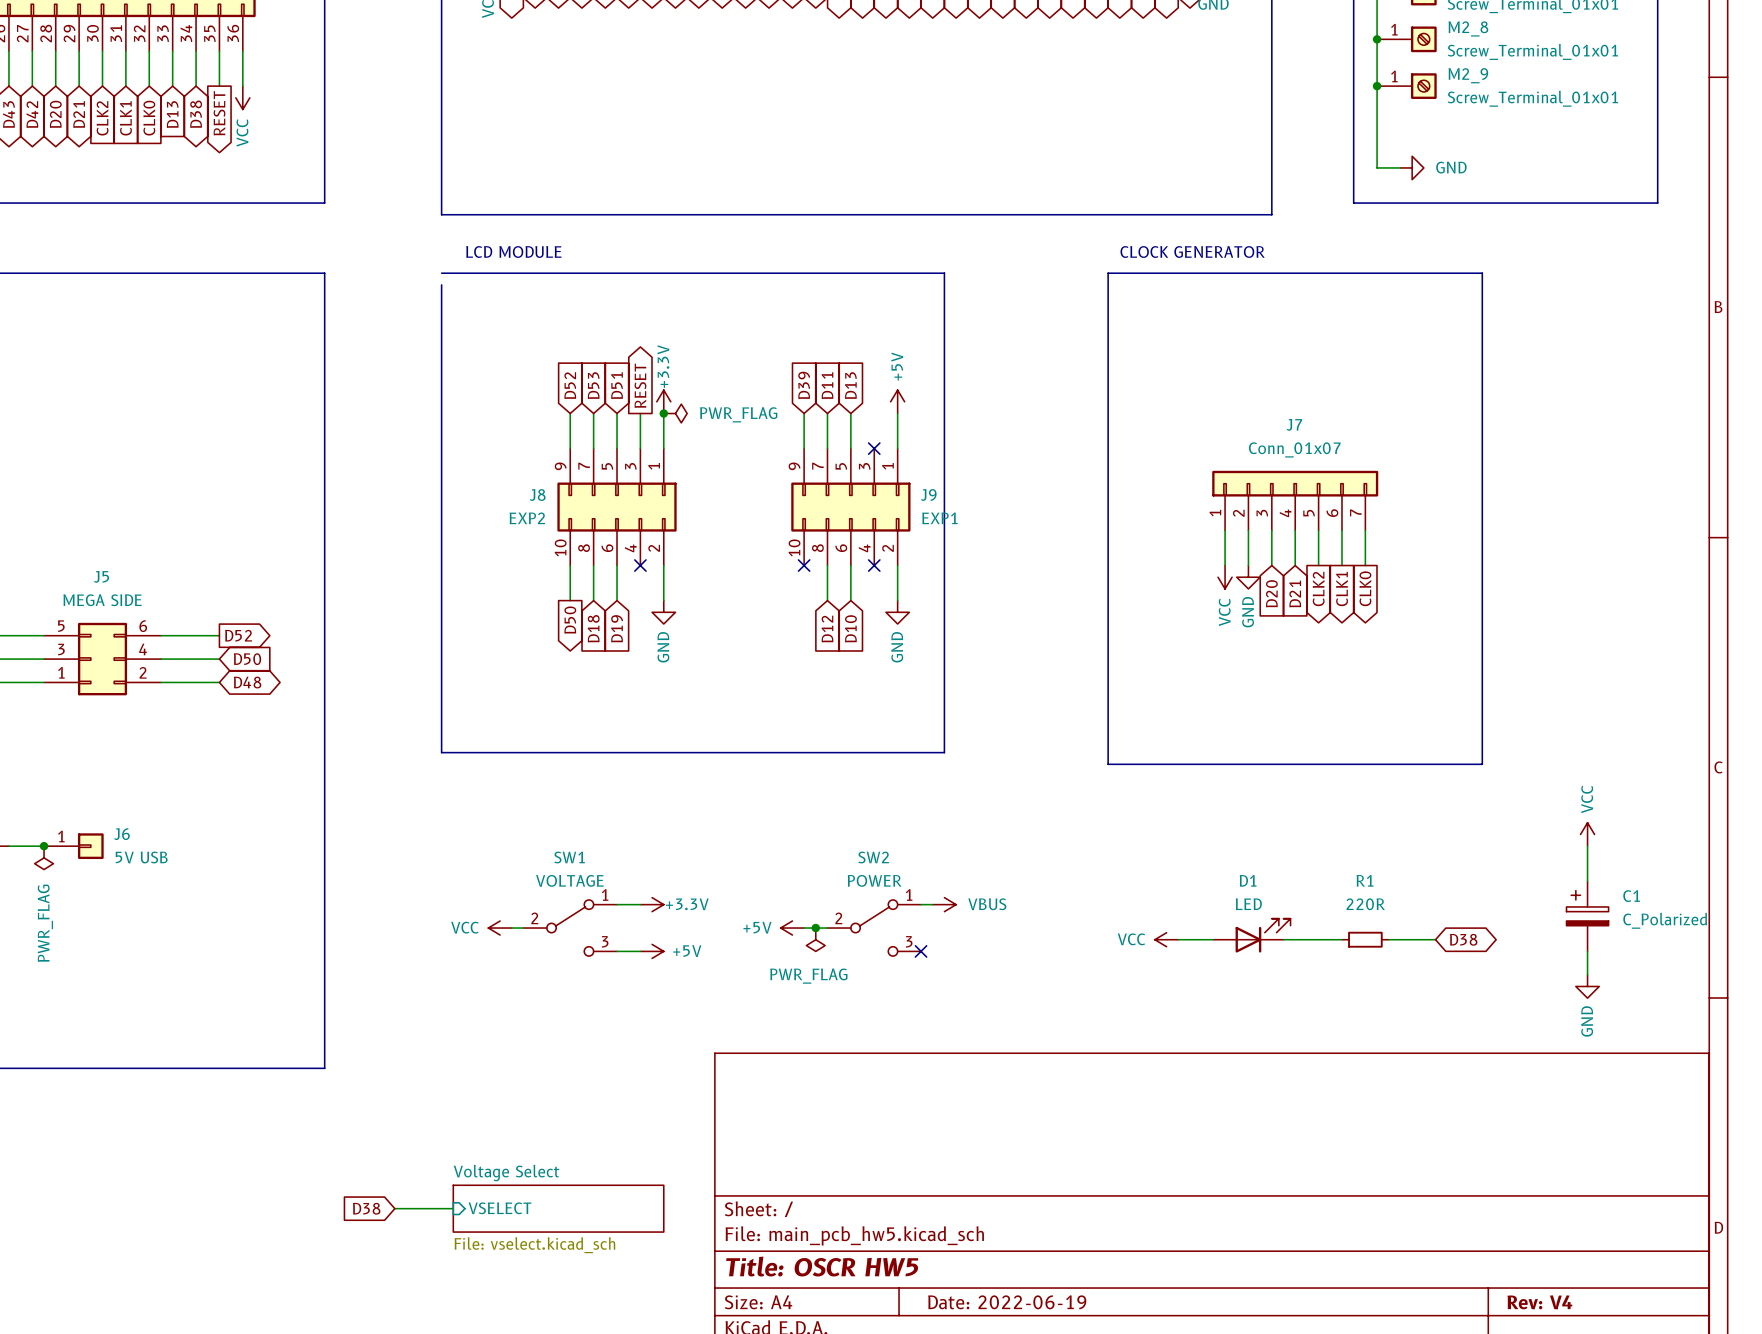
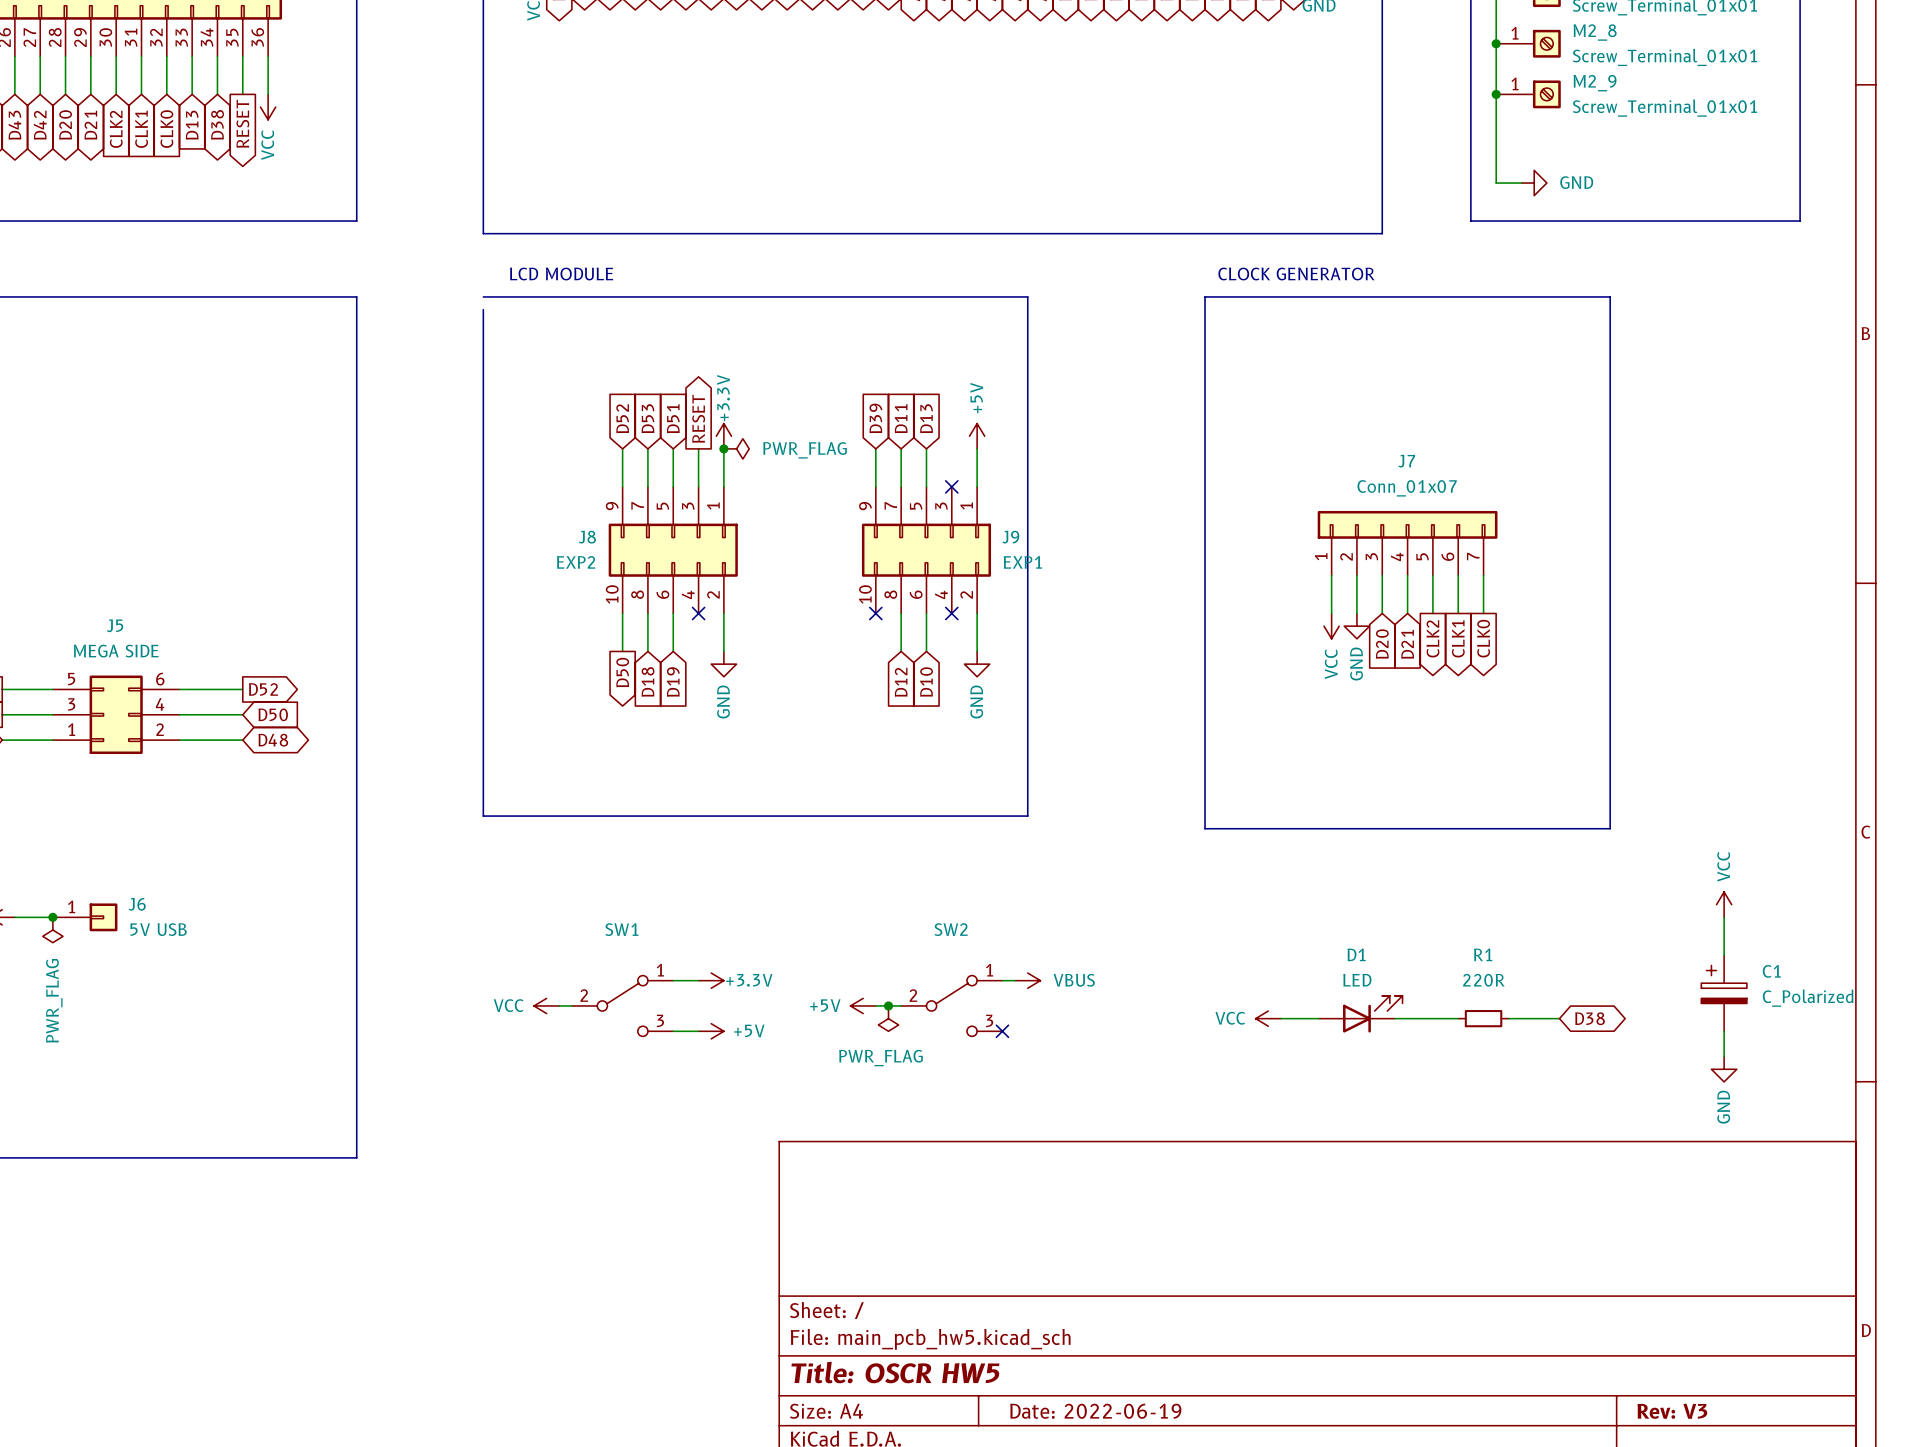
SW1 value: VOLTAGE (569, 880) -> none
SW2 value: POWER (874, 880) -> none
global label: D38 (366, 1208) -> none
wire: (394, 1208) (453, 1208) -> none
sheet pin: VSELECT (500, 1208) -> none
sheet Voltage Select: File: vselect.kicad_sch (558, 1208) -> none
title block: Rev: V4 (1539, 1302) -> Rev: V3 (1672, 1411)

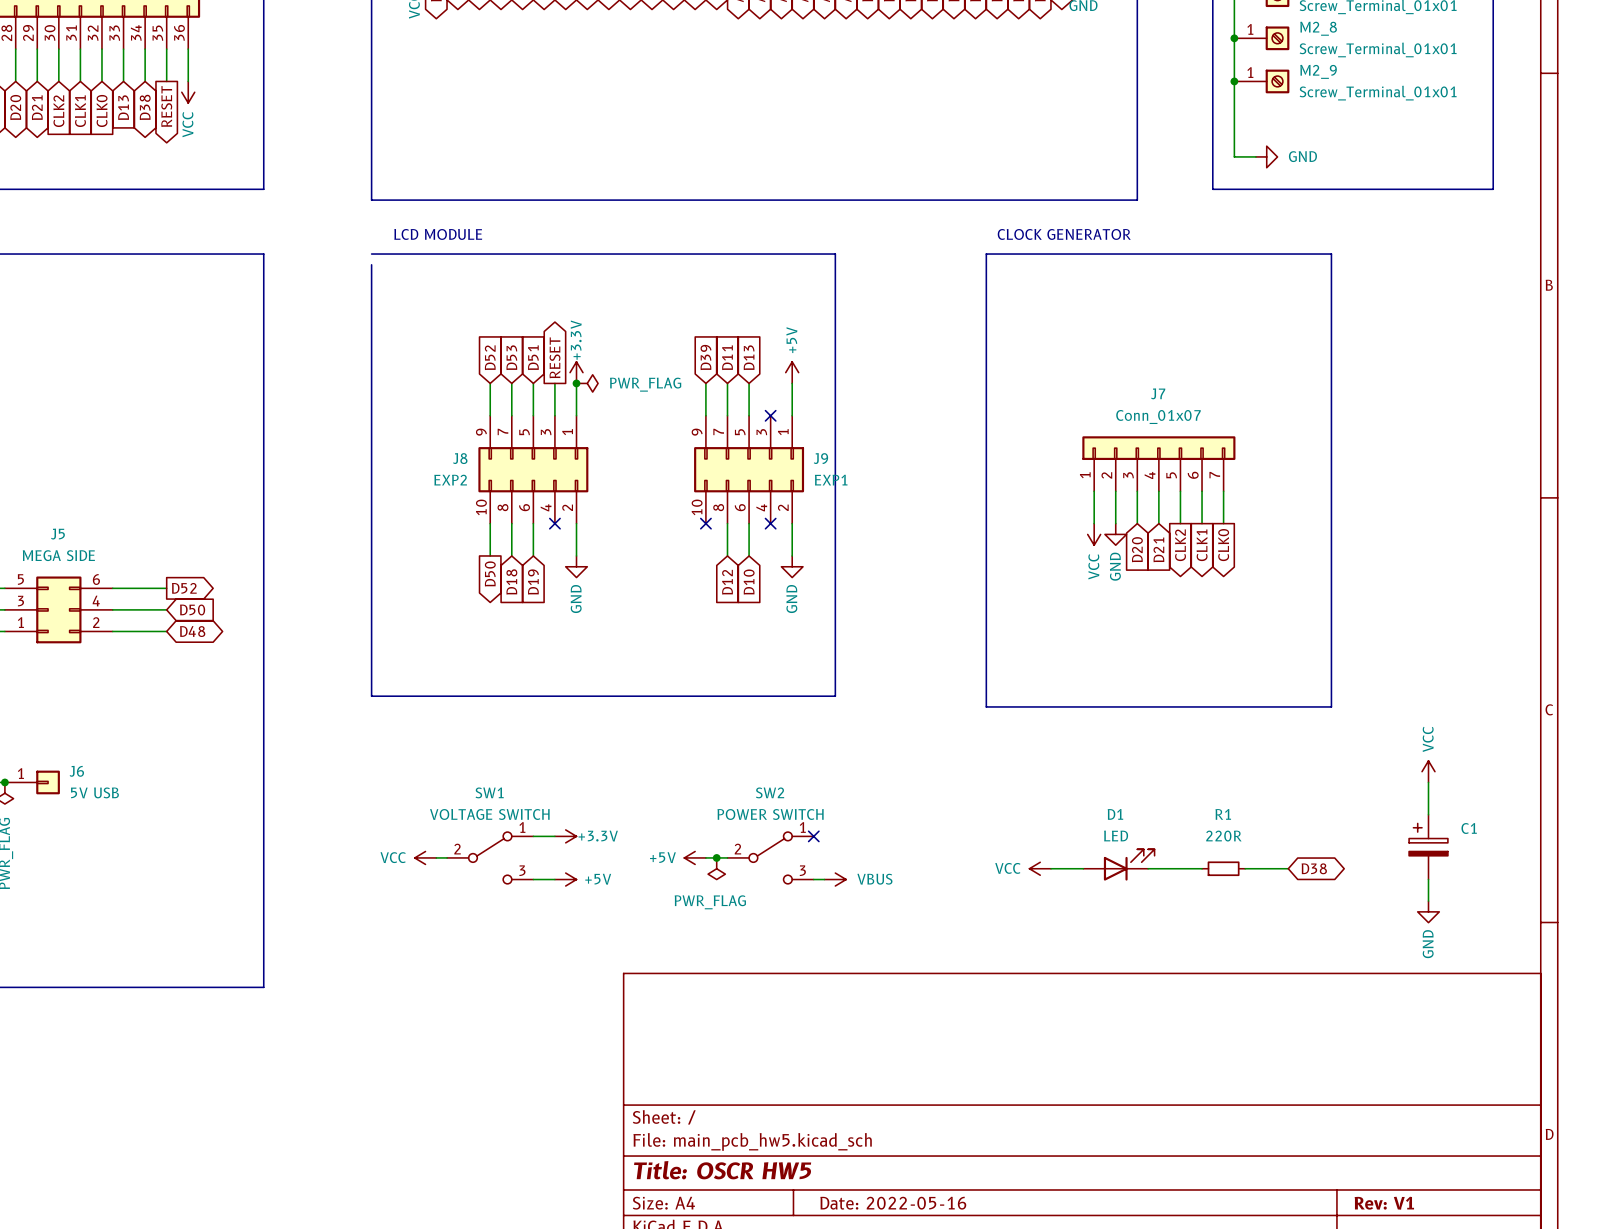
SW1 value: none -> VOLTAGE SWITCH (489, 814)
SW2 value: none -> POWER SWITCH (770, 814)
wire: (1002, 980) (1015, 980) -> (813, 879) (824, 879)
power symbol position: VBUS (1027, 980) -> VBUS (835, 879)
C1 value: C_Polarized (1808, 998) -> none
no-connect mark position: (1002, 1031) -> (813, 836)
title block: Date: 2022-06-19 (1095, 1411) -> Date: 2022-05-16 (893, 1203)
title block: Rev: V3 (1672, 1411) -> Rev: V1 (1384, 1203)

